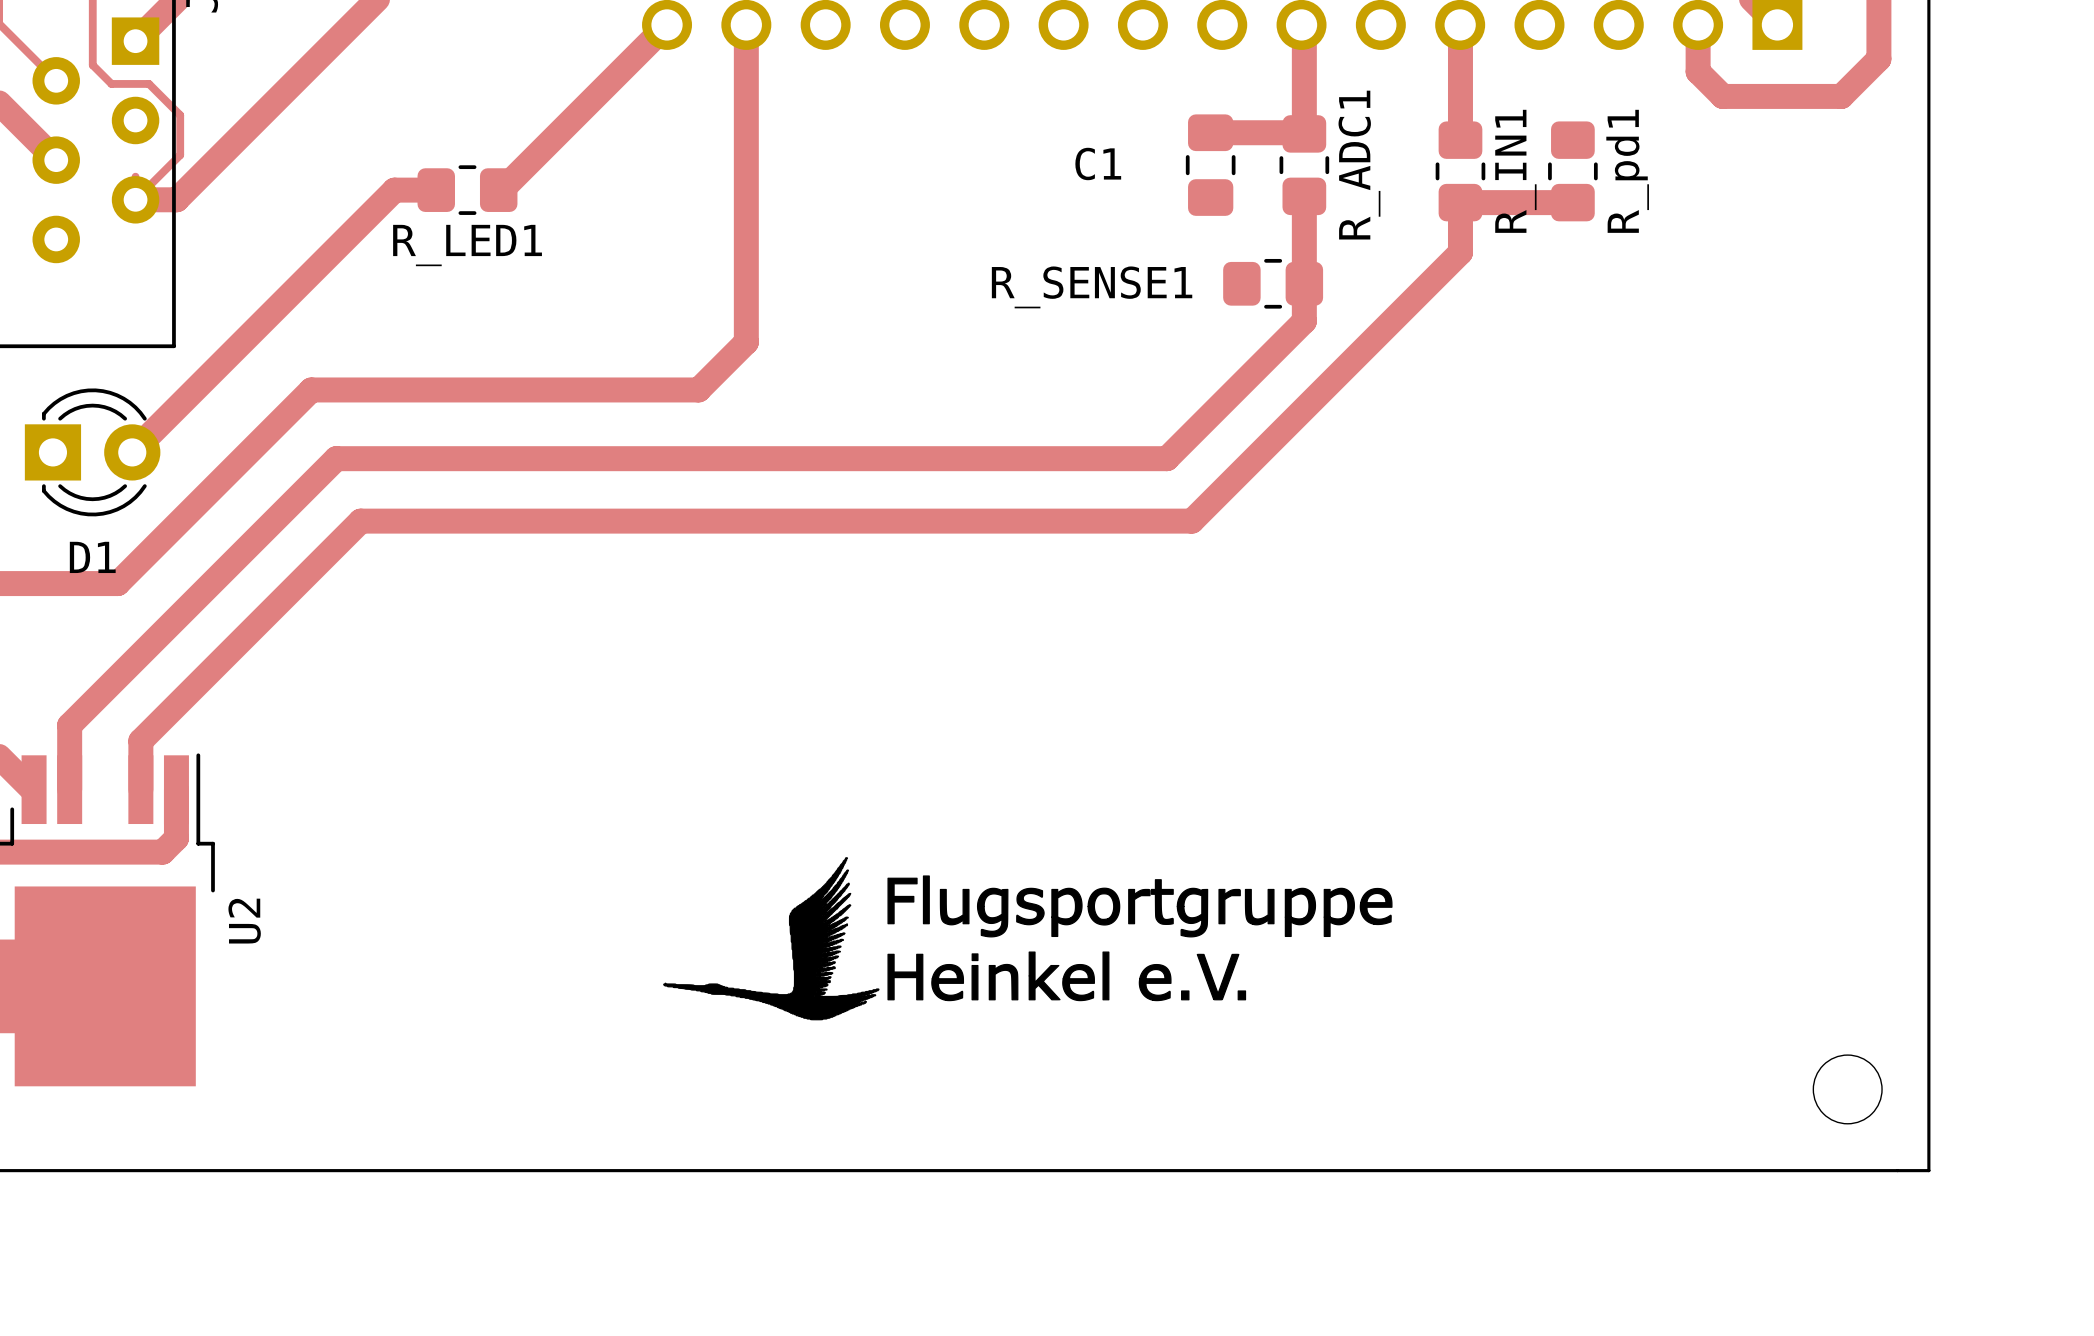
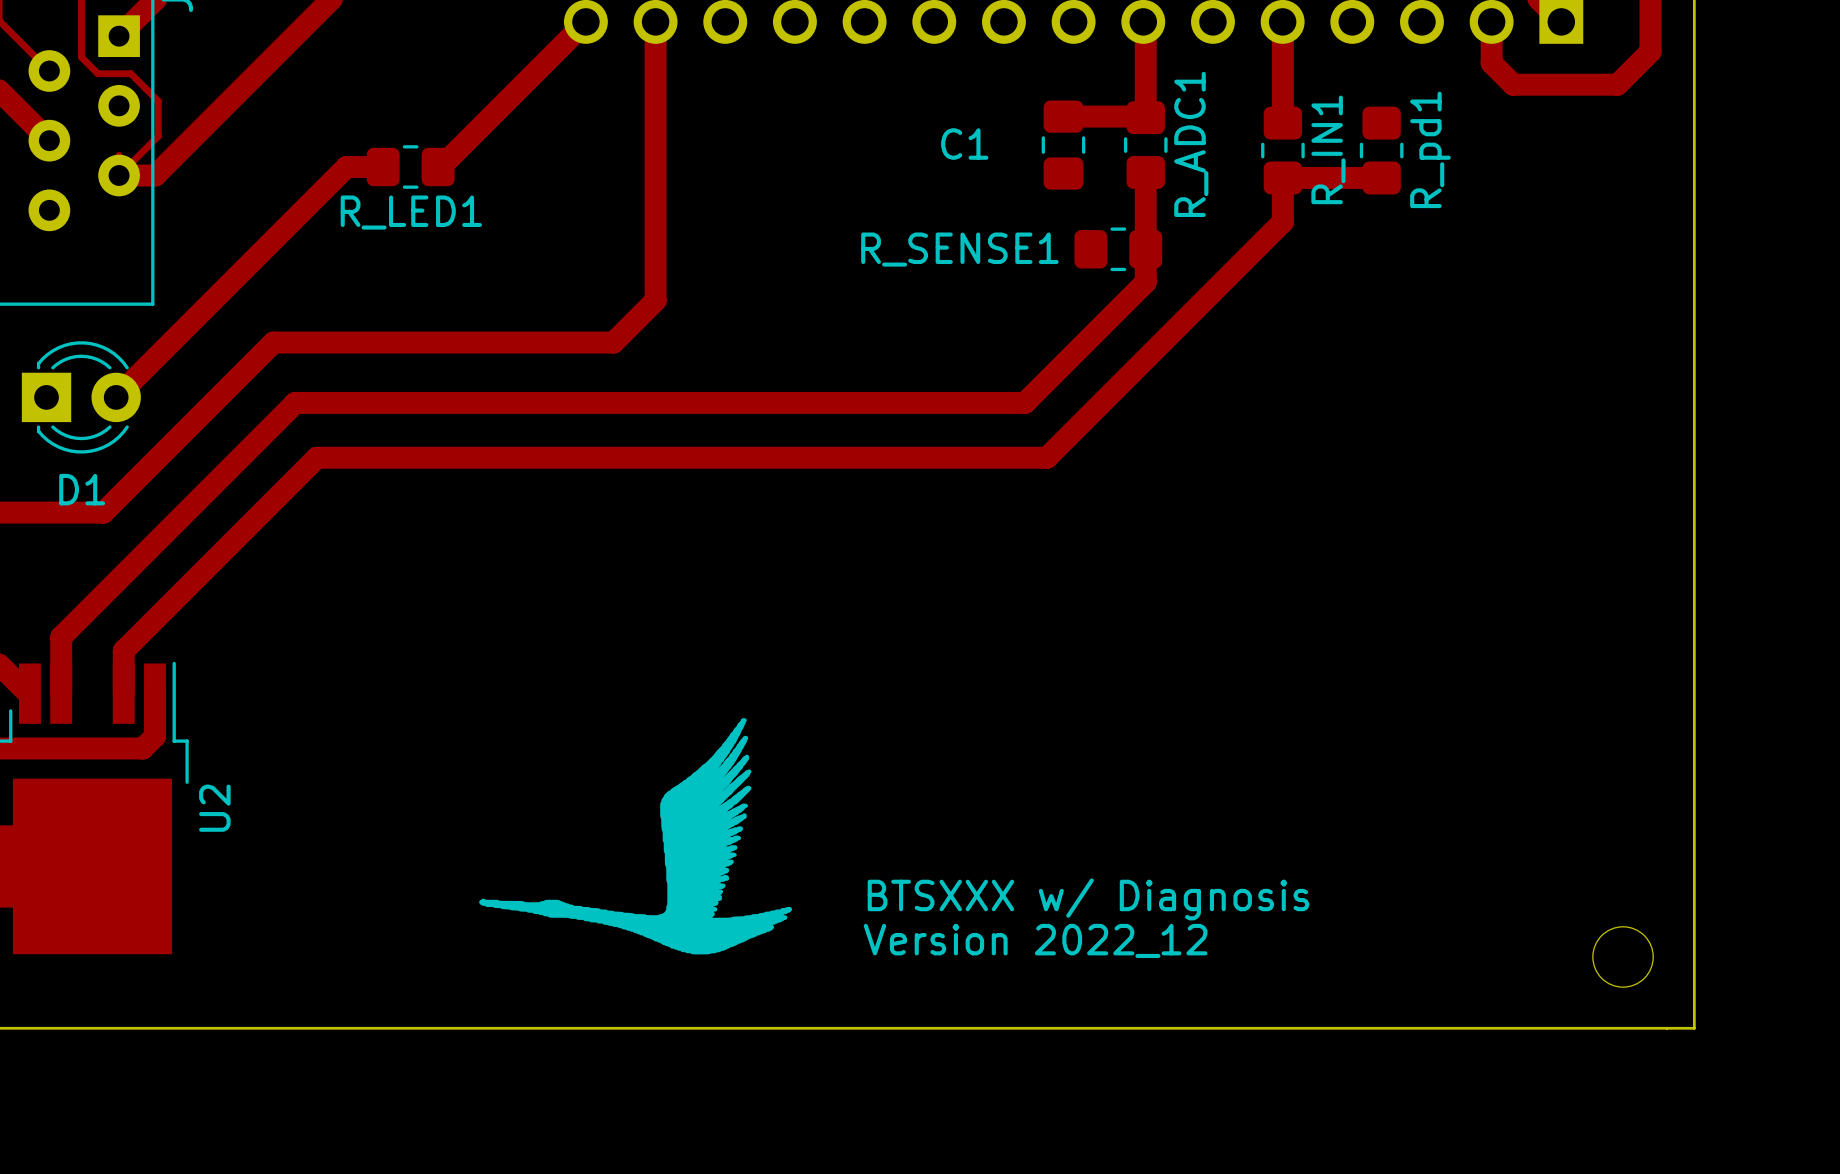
drawing: none -> [479, 718, 792, 955]
drawing: [663, 857, 1393, 1021] -> none
text: none -> BTSXXX w/ Diagnosis (1088, 899)
text: none -> Version 2022_12 (1035, 940)

